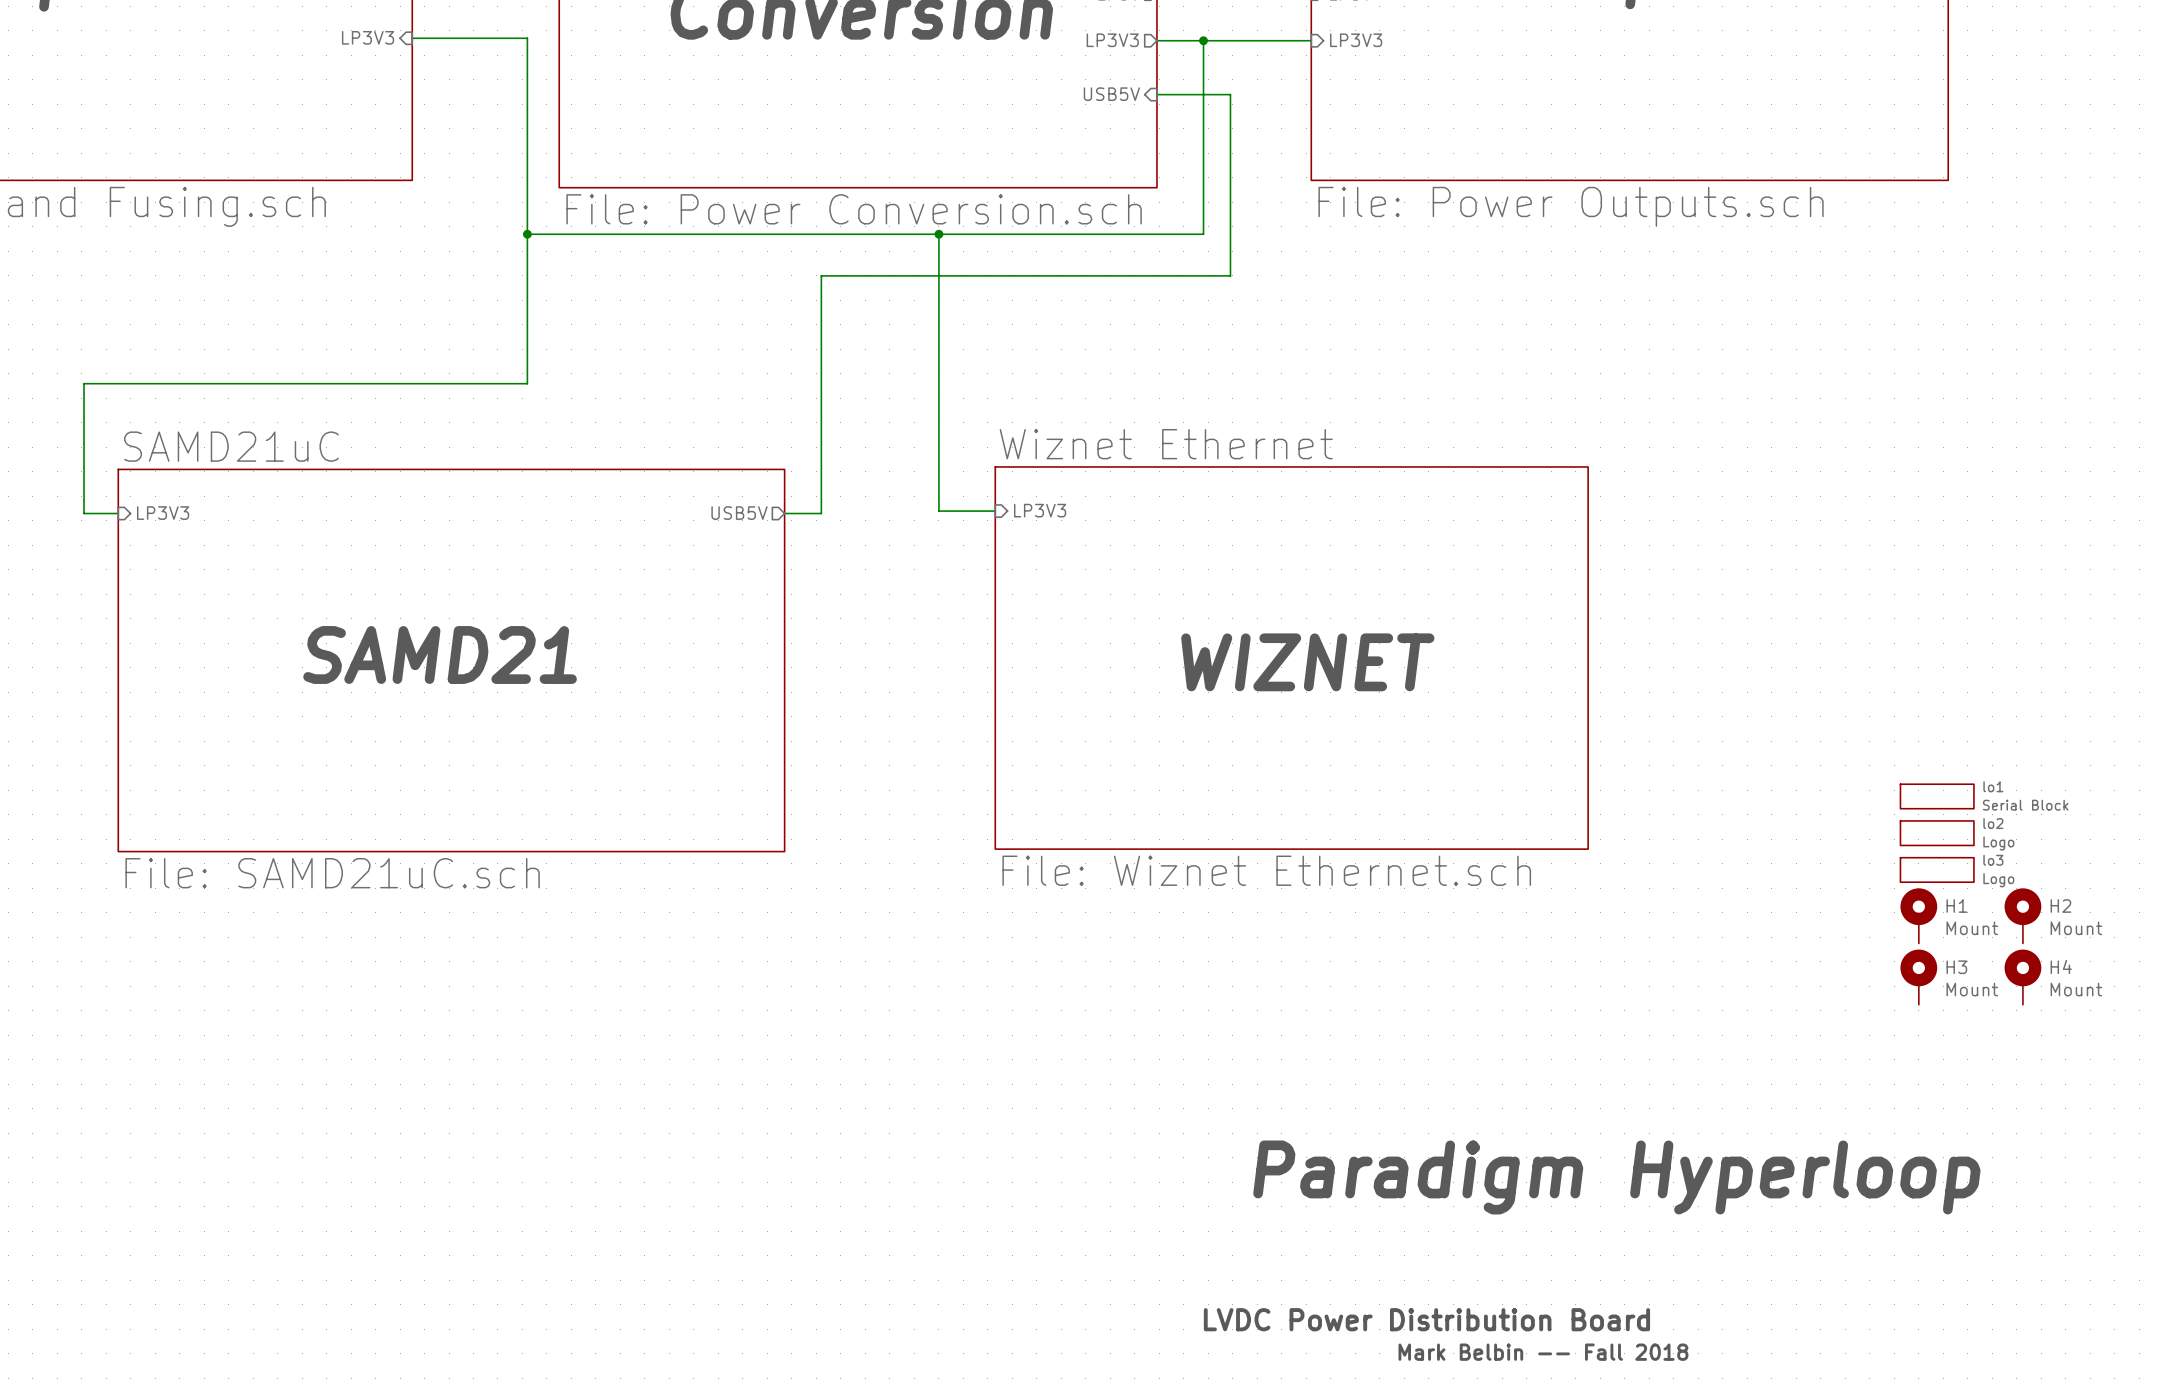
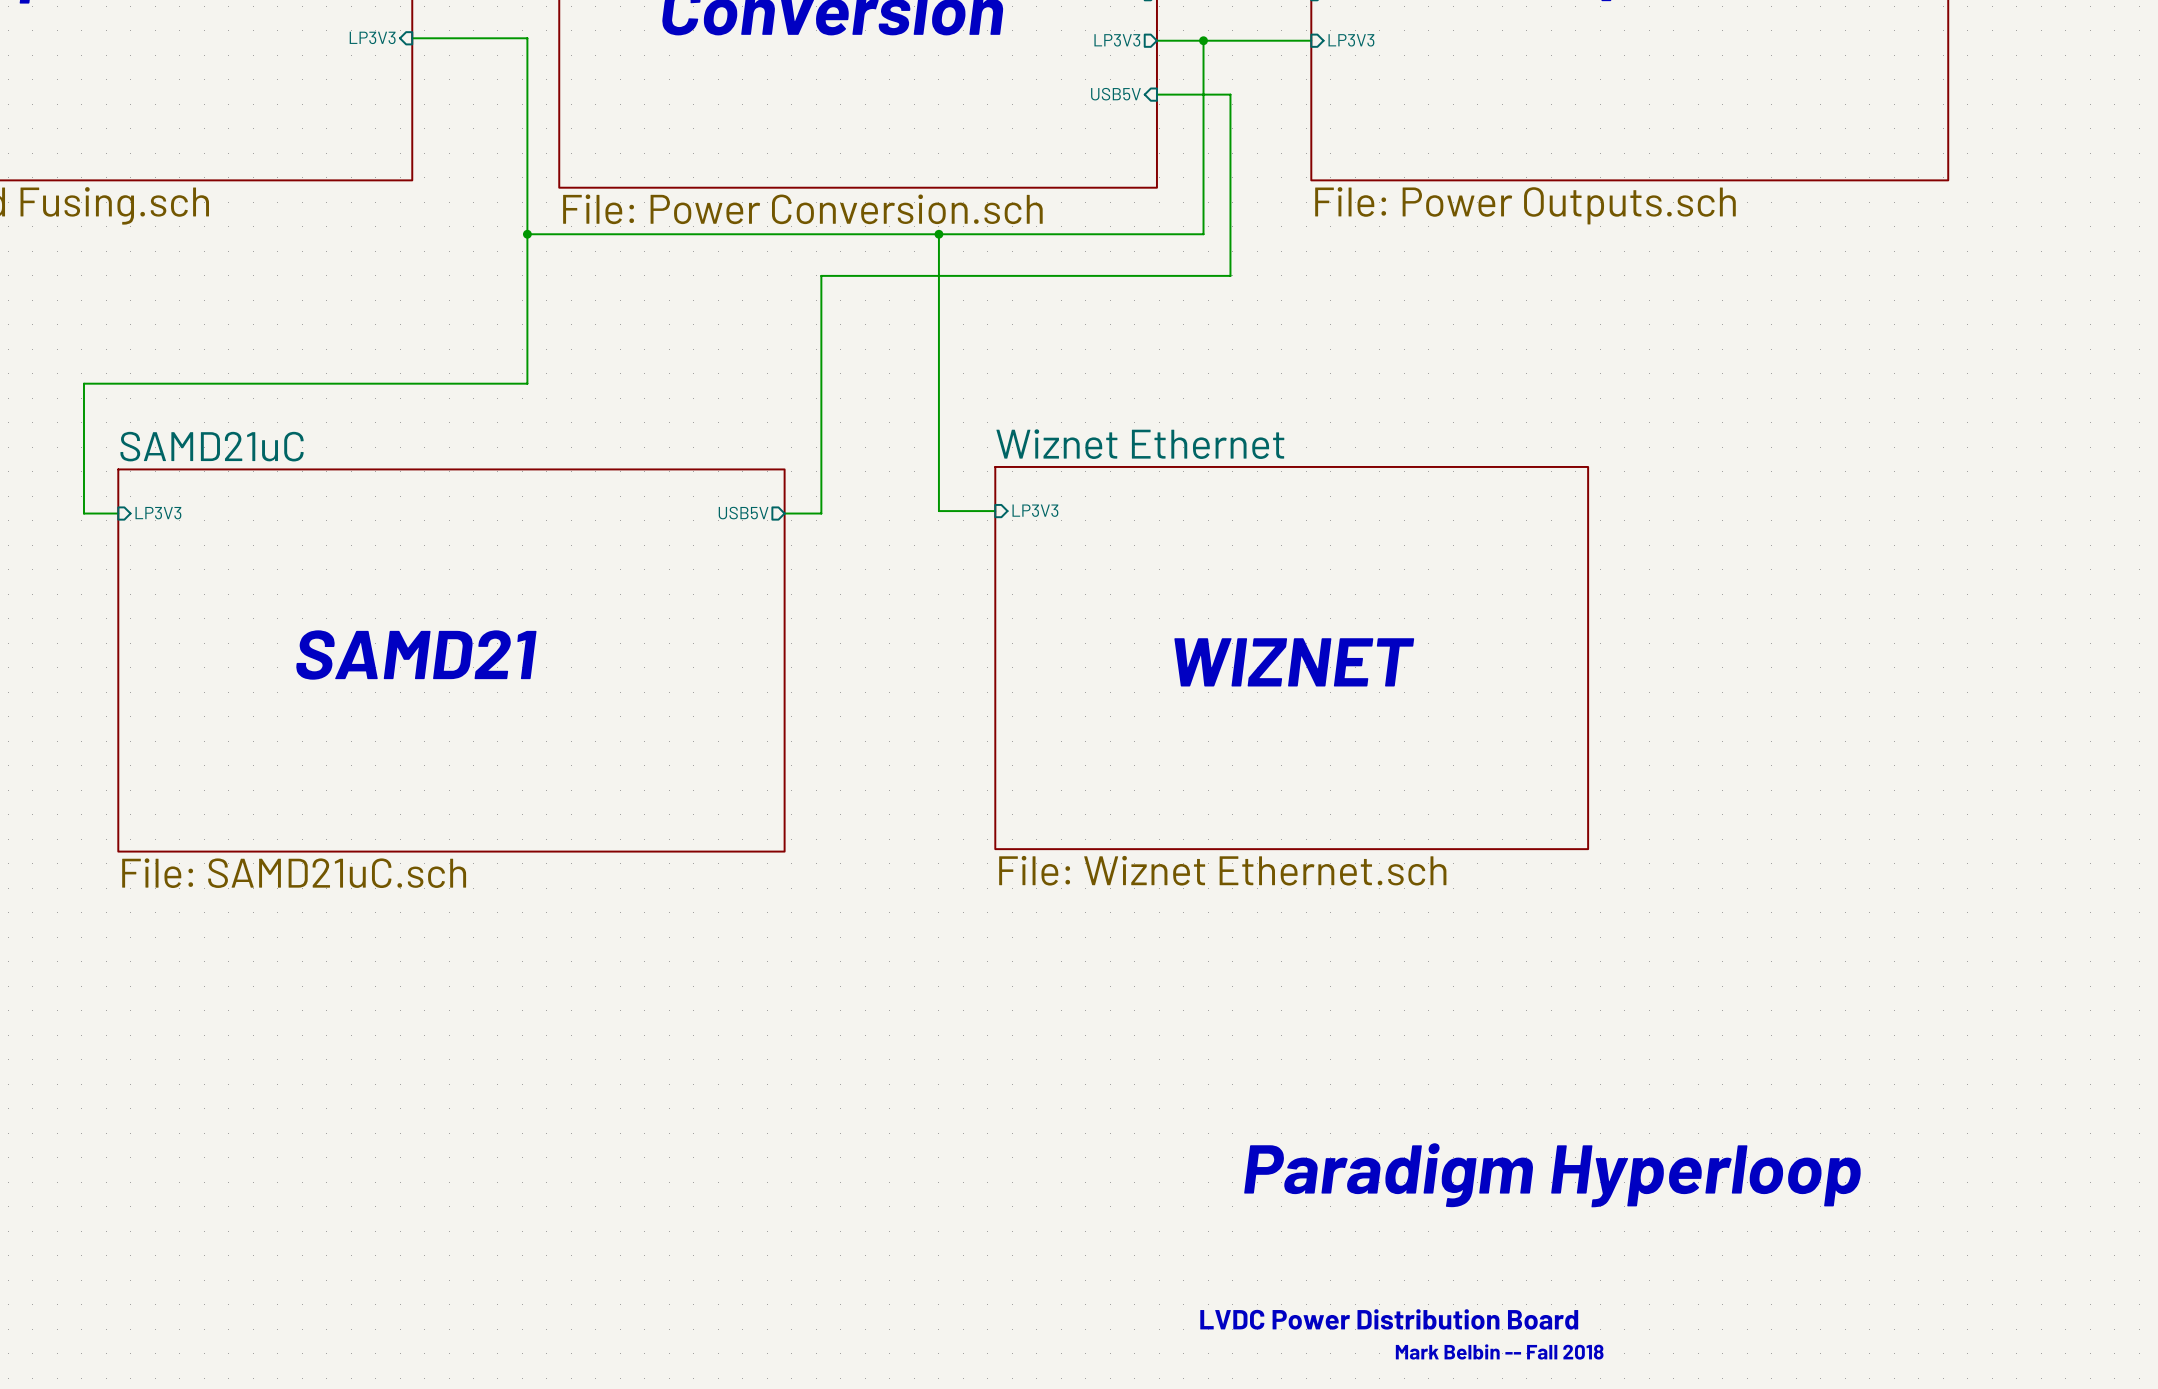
lo1: Serial Block (1937, 796) -> none
lo2: Logo (1937, 833) -> none
lo3: Logo (1937, 869) -> none
H1: Mount (1918, 915) -> none
H2: Mount (2022, 915) -> none
H3: Mount (1918, 977) -> none
H4: Mount (2022, 977) -> none

